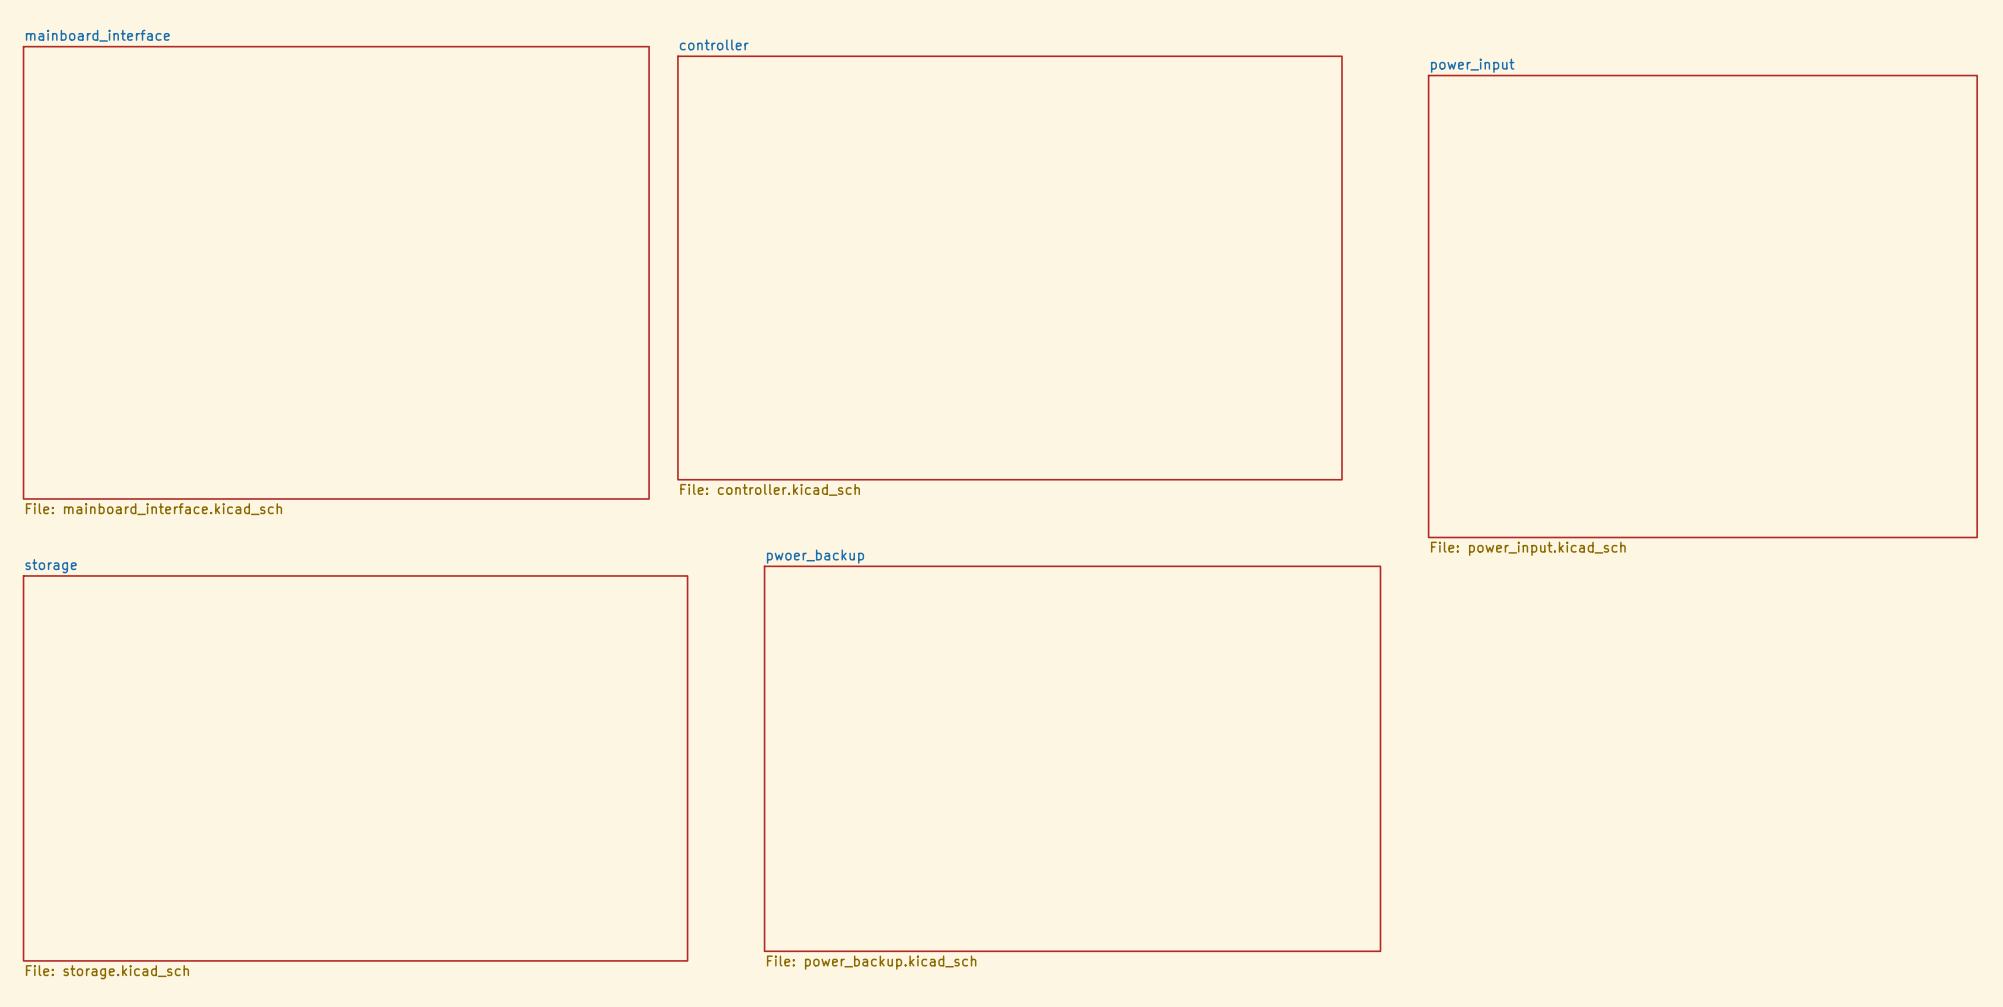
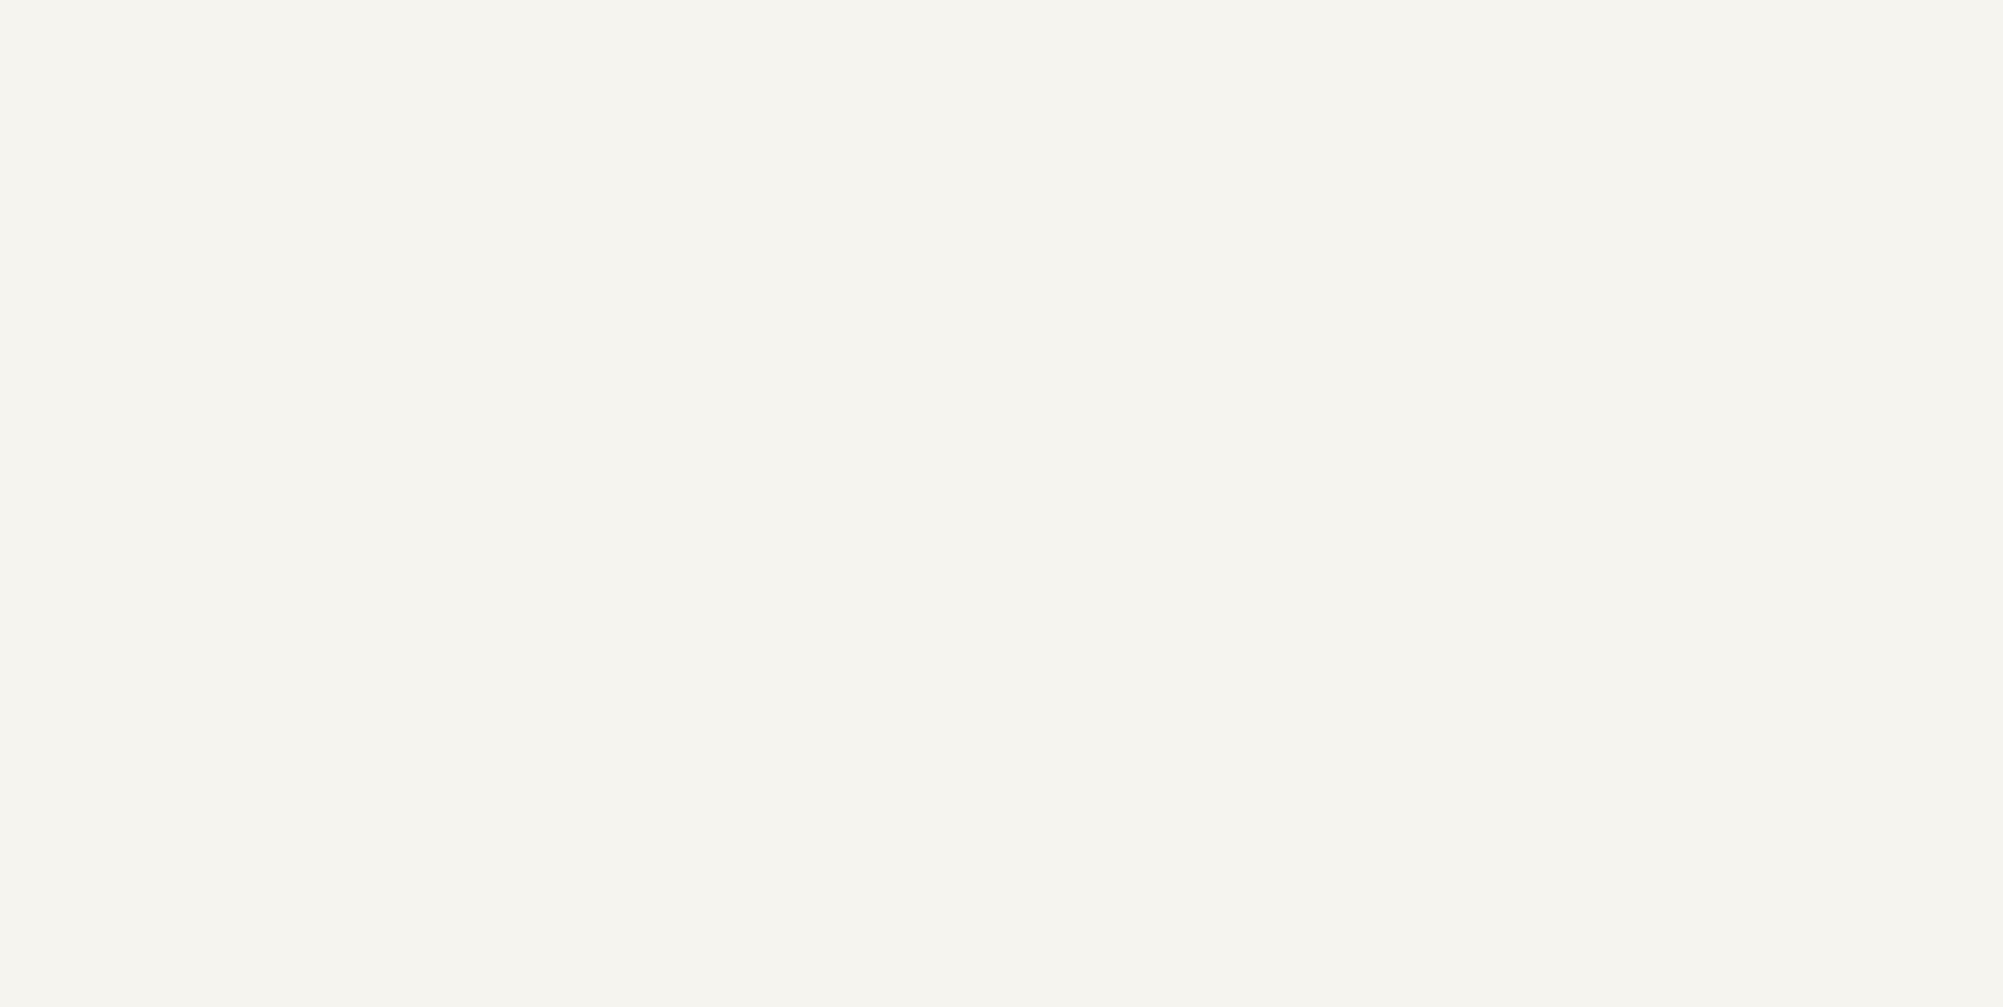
sheet controller: File: controller.kicad_sch (1009, 268) -> none
sheet mainboard_interface: File: mainboard_interface.kicad_sch (336, 272) -> none
sheet power_input: File: power_input.kicad_sch (1702, 306) -> none
sheet pwoer_backup: File: power_backup.kicad_sch (1072, 758) -> none
sheet storage: File: storage.kicad_sch (355, 768) -> none

